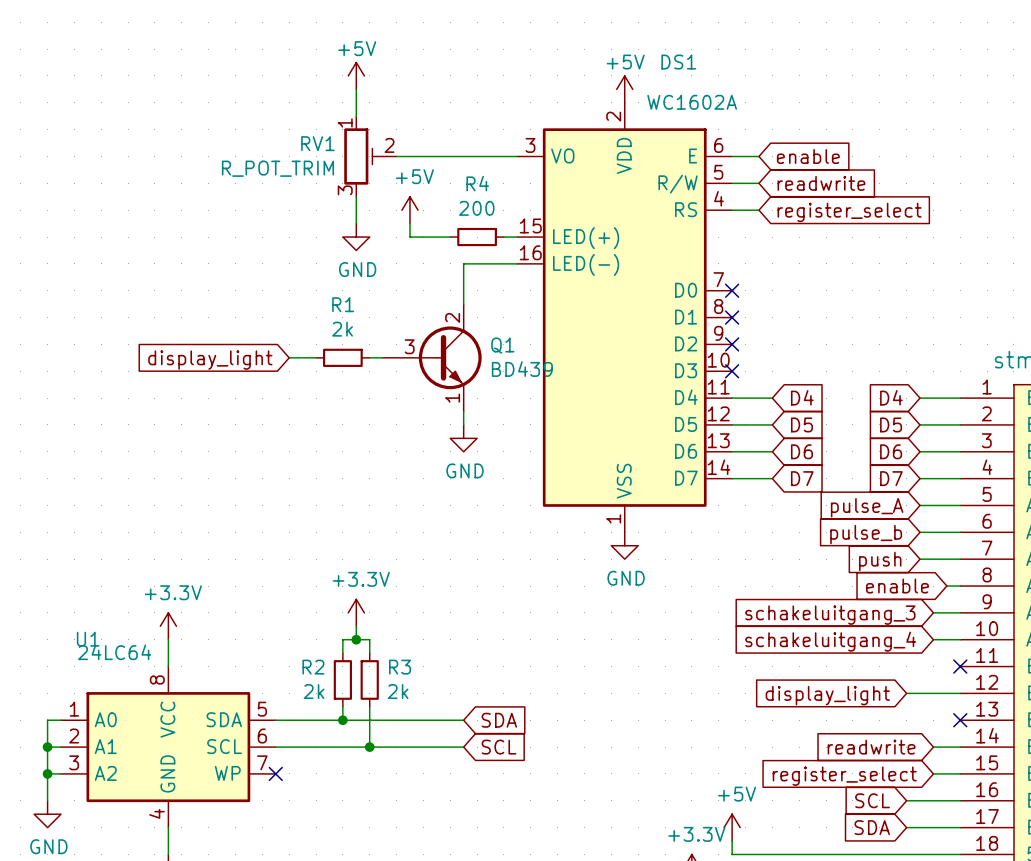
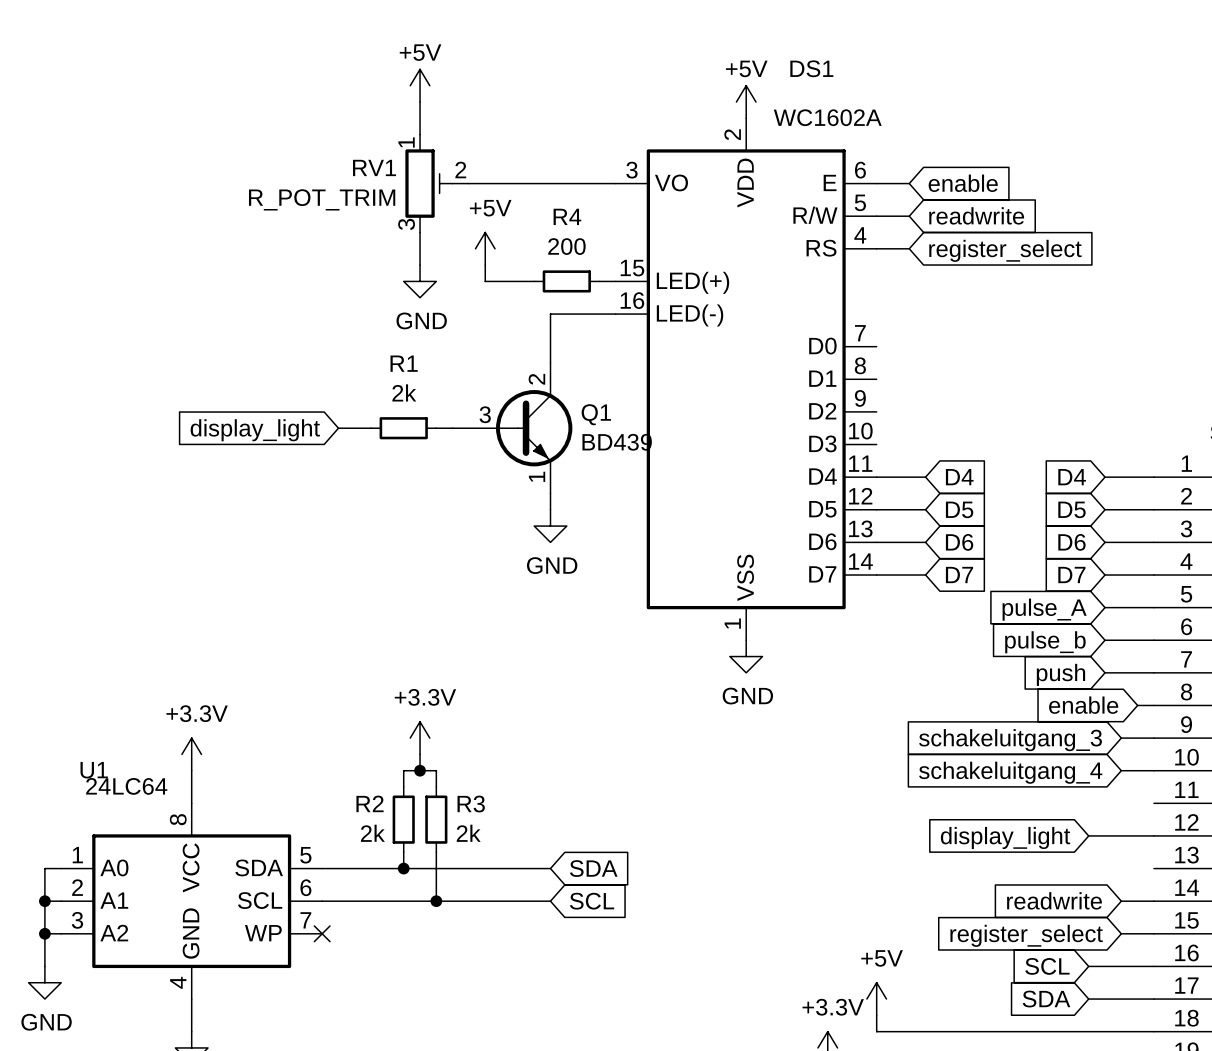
no-connect mark: (732, 290) -> none
no-connect mark: (732, 317) -> none
no-connect mark: (732, 344) -> none
no-connect mark: (732, 371) -> none
no-connect mark: (960, 666) -> none
no-connect mark: (960, 720) -> none

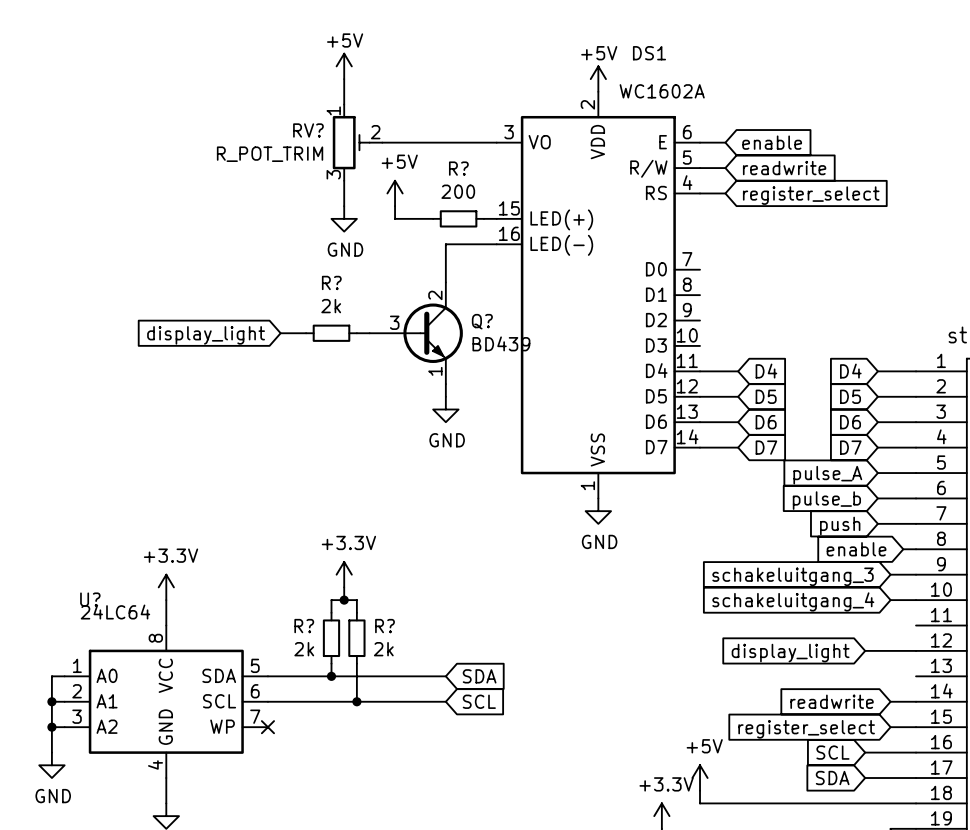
RV1 name: RV1 (374, 167) -> RV? (308, 130)
R4 name: R4 (567, 216) -> R? (458, 168)
R1 name: R1 (404, 363) -> R? (331, 282)
Q1 name: Q1 (596, 414) -> Q? (482, 321)
U1 name: U1 (94, 770) -> U? (90, 599)
R2 name: R2 (370, 803) -> R? (304, 626)
R3 name: R3 (471, 804) -> R? (385, 626)

